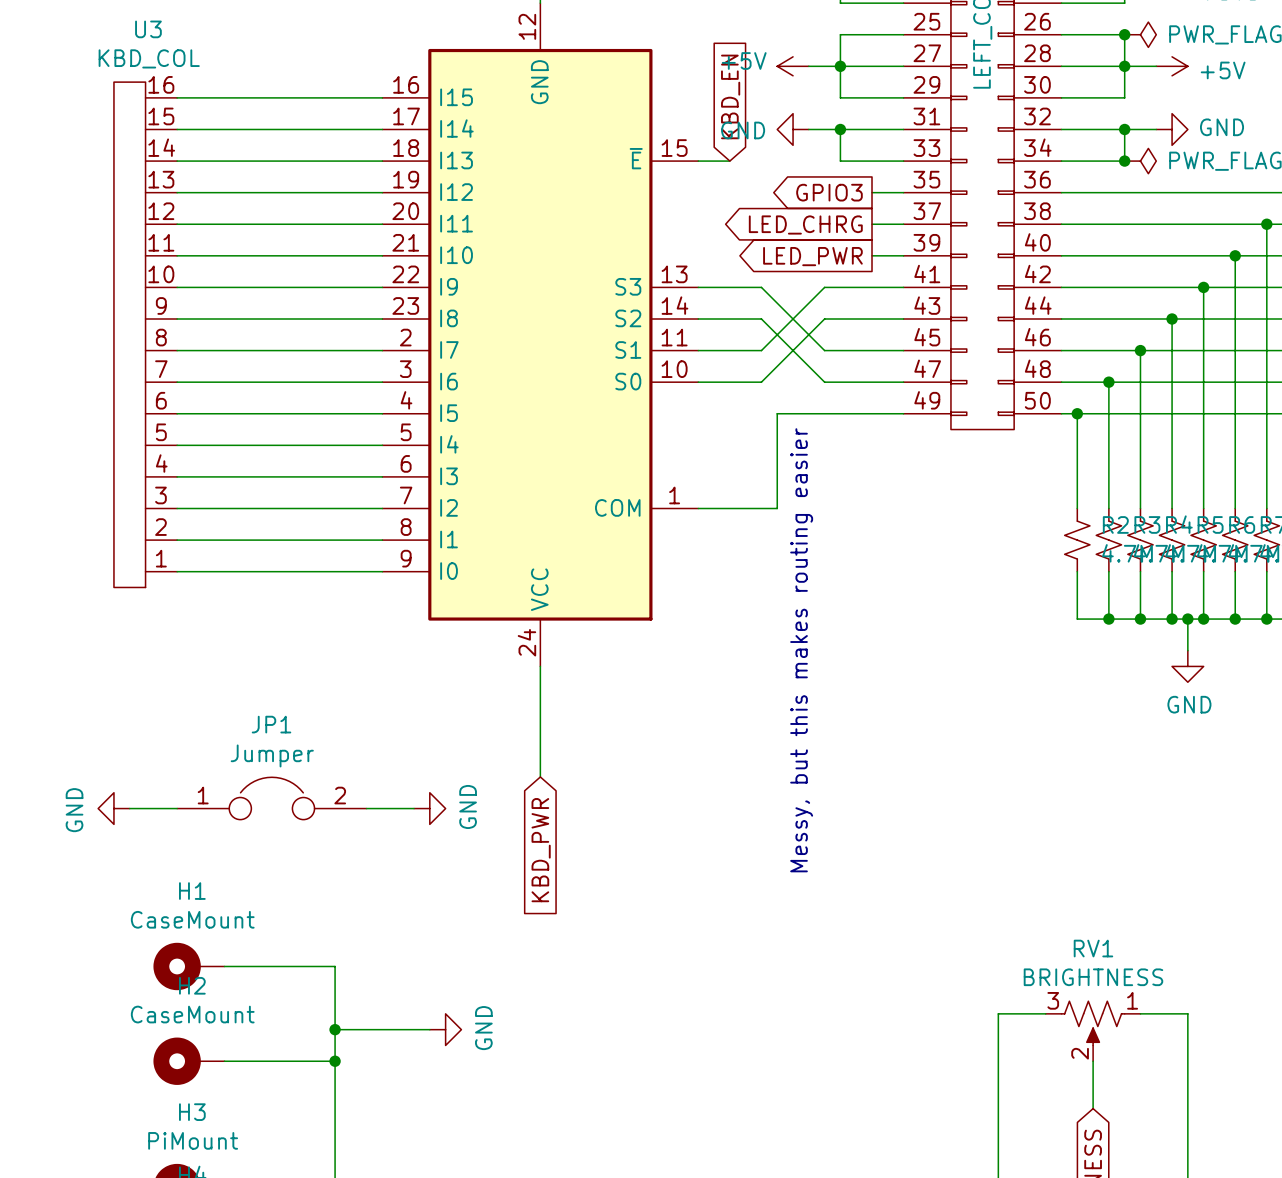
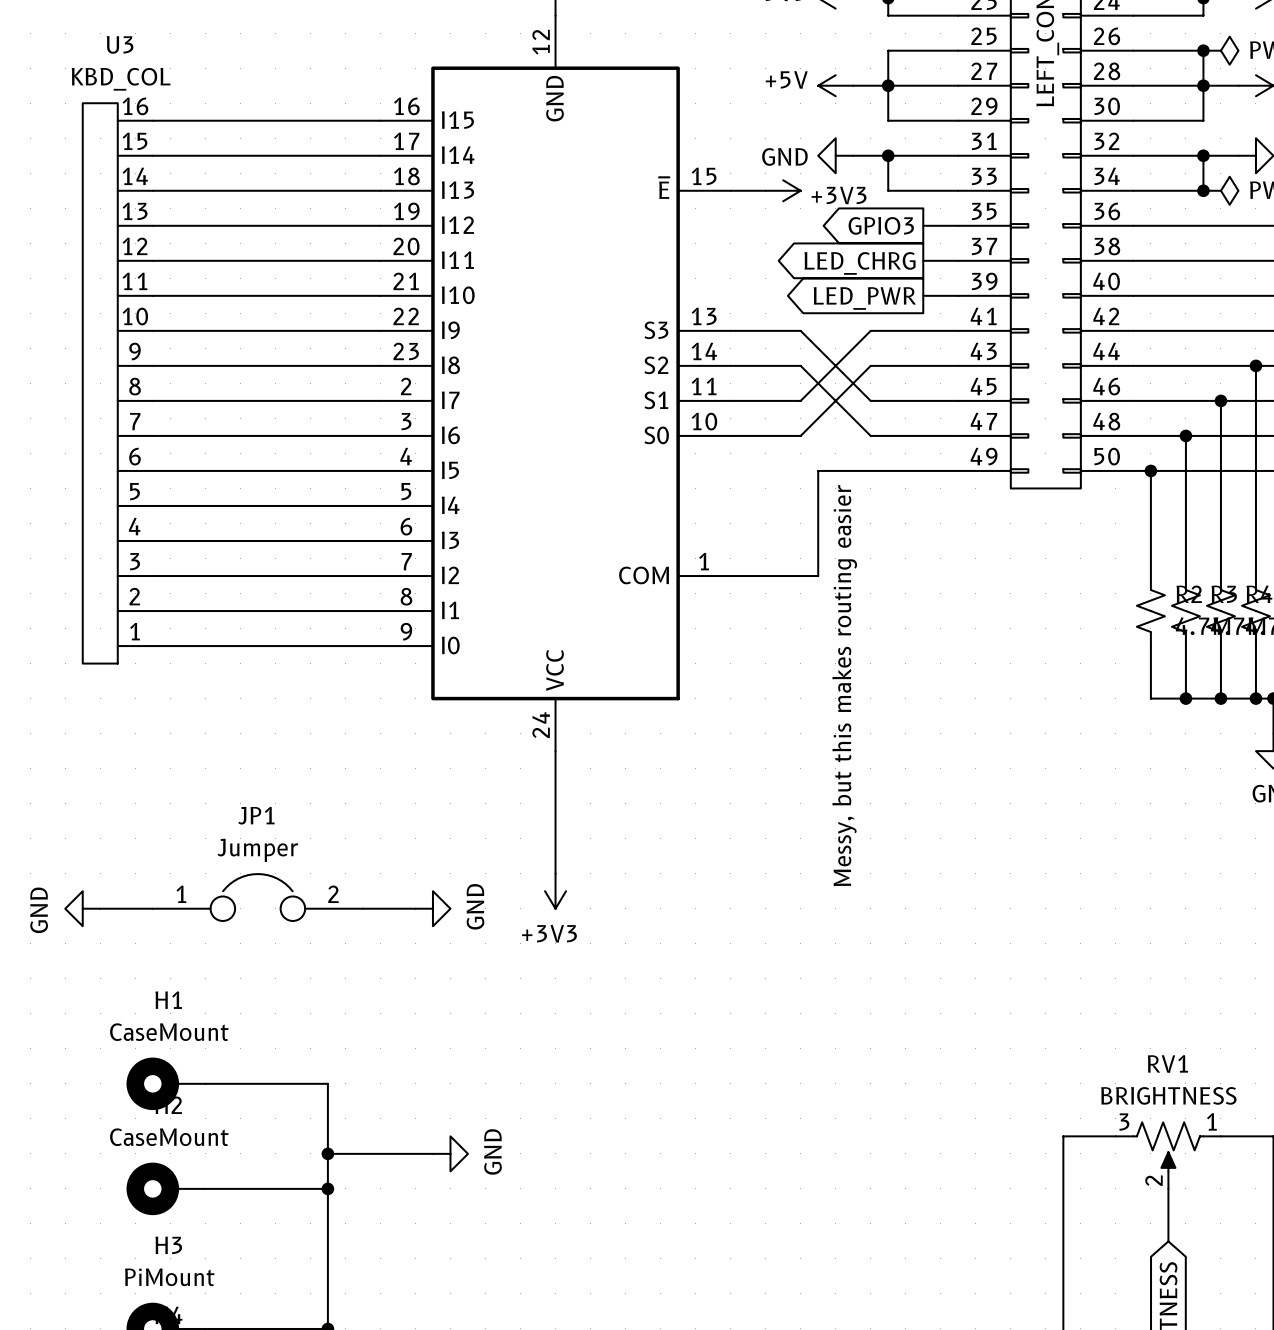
global label: KBD_EN (730, 96) -> none
power symbol: none -> +3V3 (783, 190)
power symbol: none -> +3V3 (555, 891)
global label: KBD_PWR (541, 850) -> none

